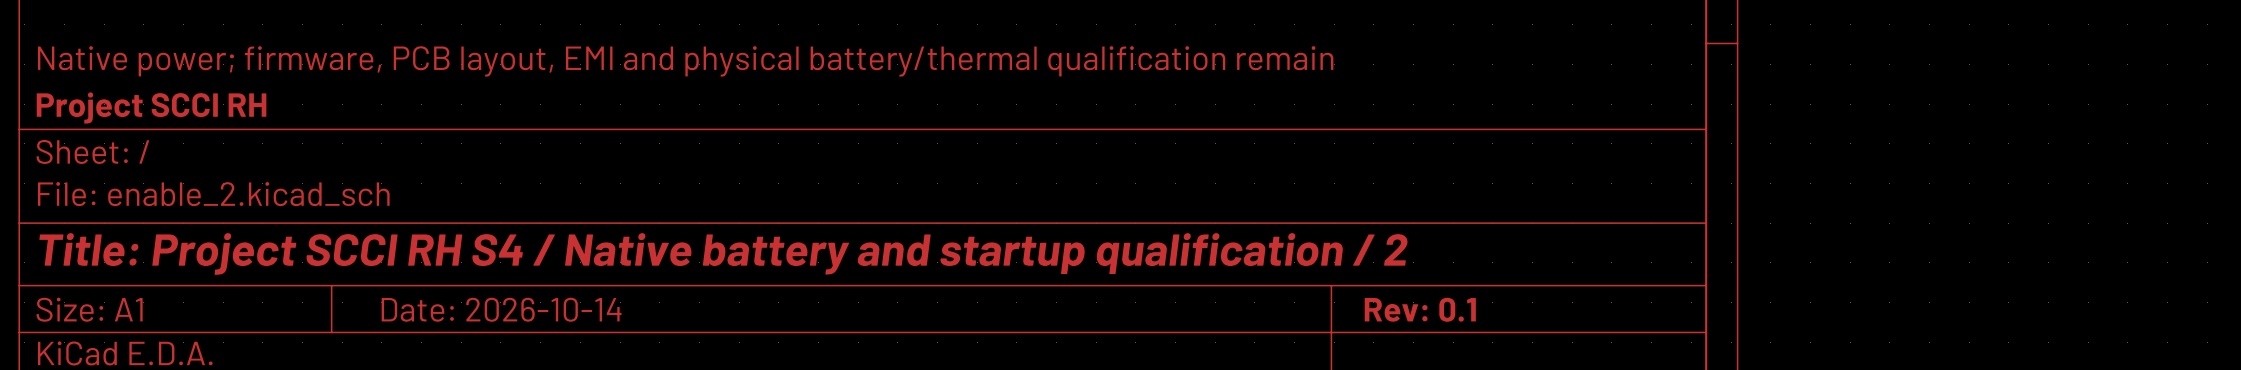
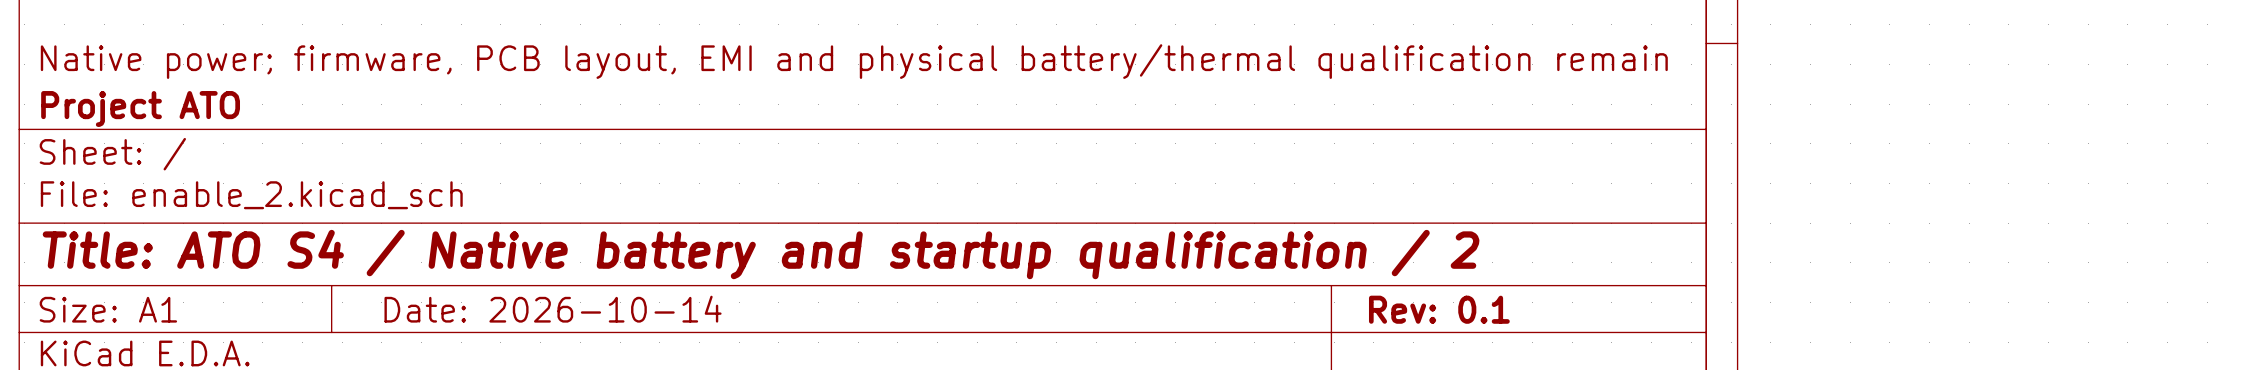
title block: Project SCCI RH (151, 108) -> Project ATO (140, 108)
title block: Title: Project SCCI RH S4 / Native battery and startup qualification / 2 (723, 254) -> Title: ATO S4 / Native battery and startup qualification / 2 (761, 254)

